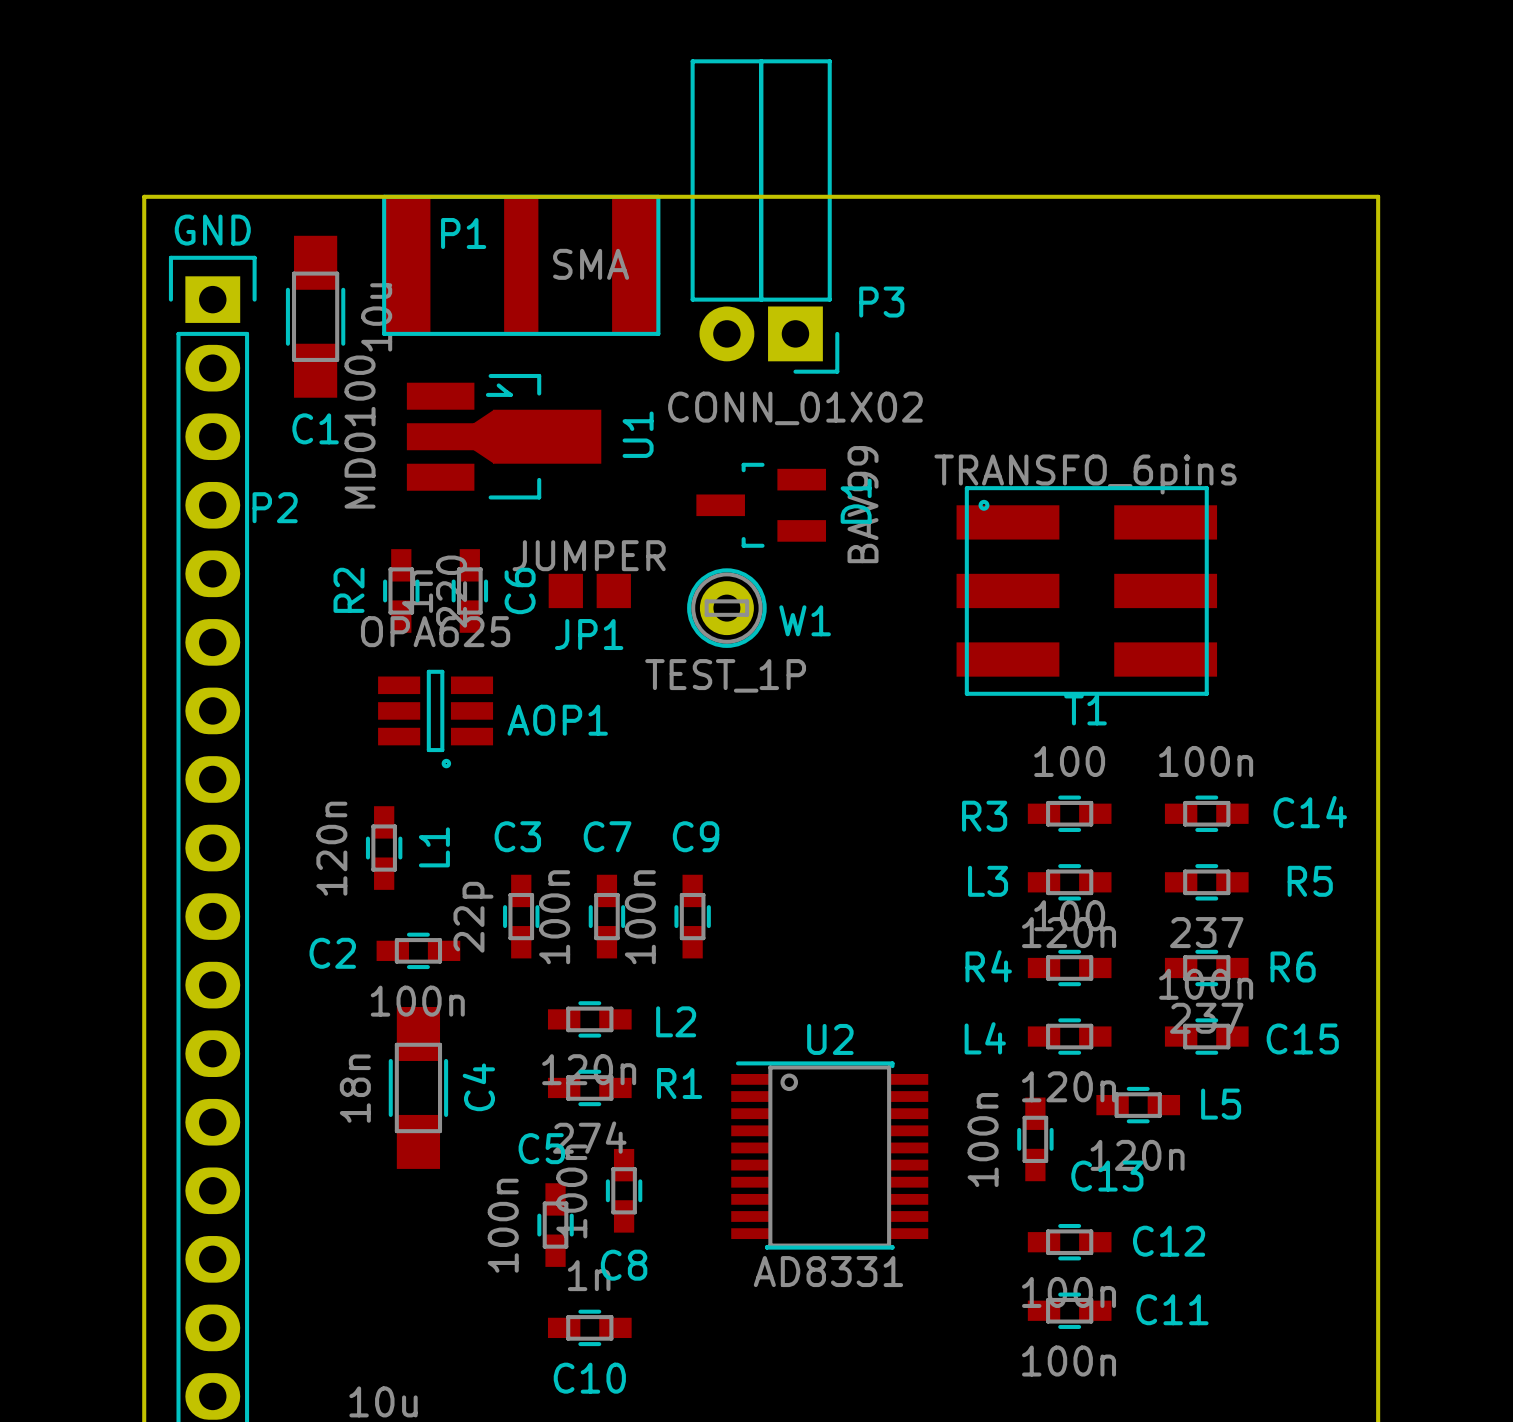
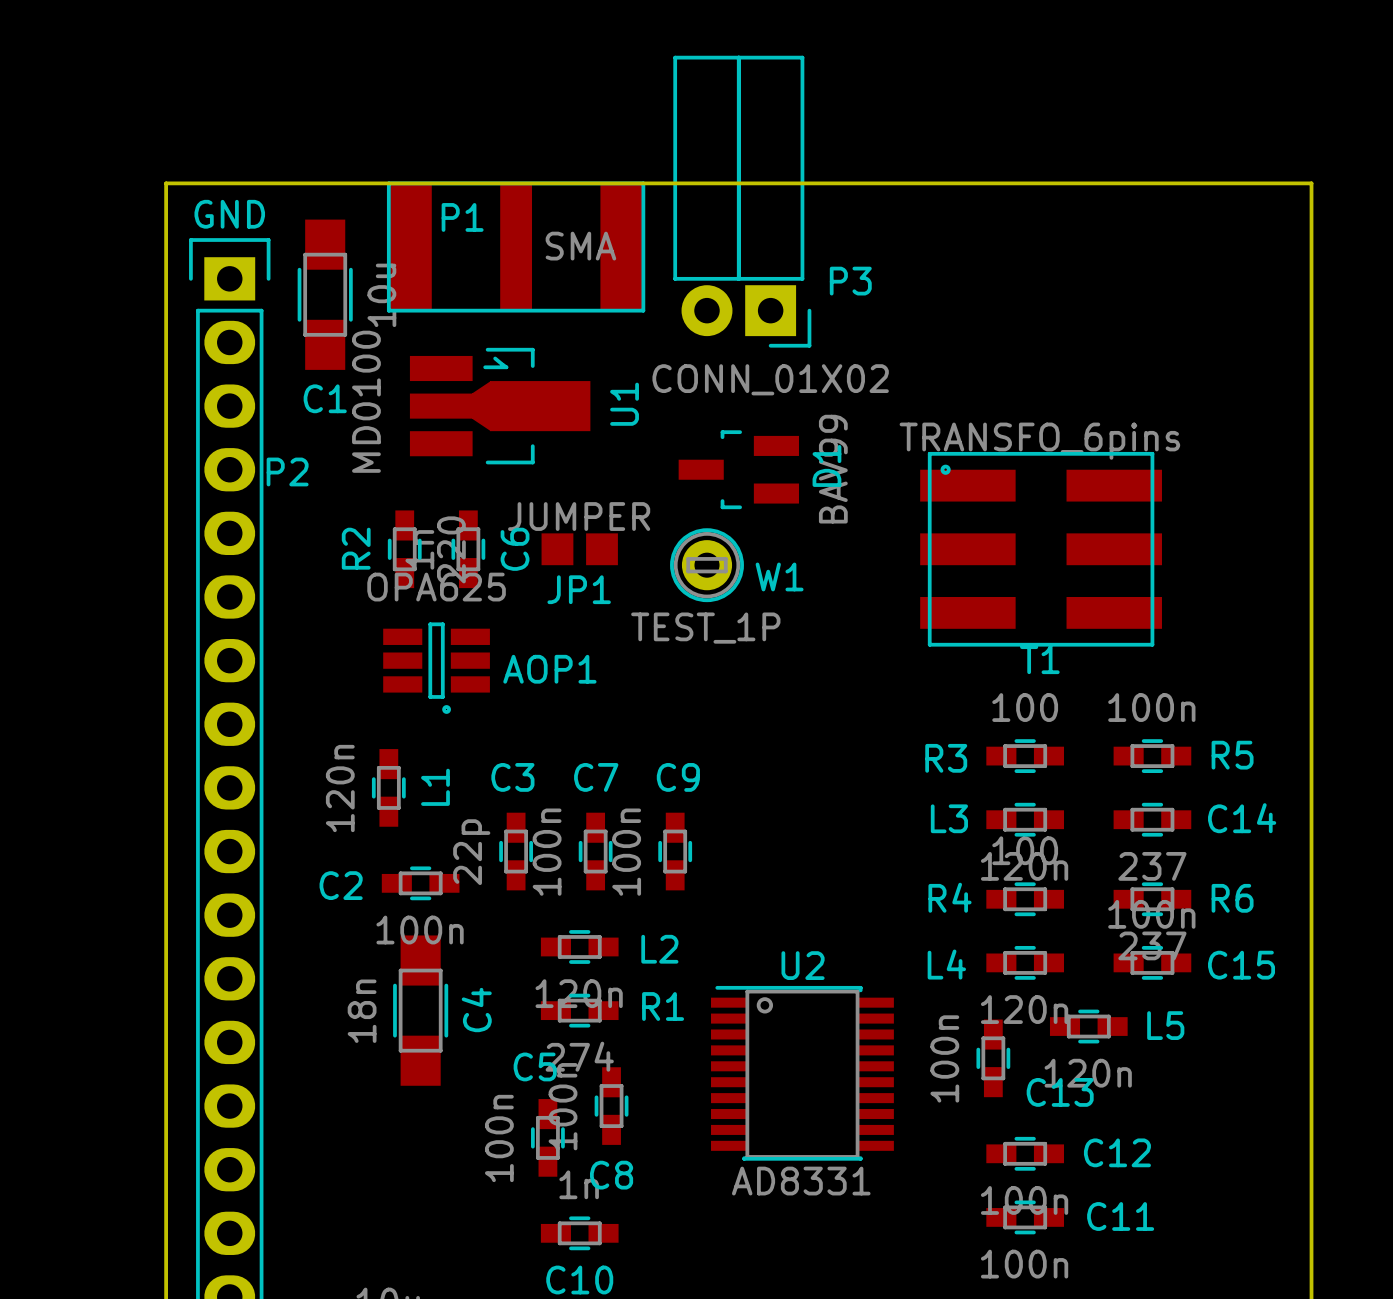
C14 name position: C14 (1310, 812) -> C14 (1242, 818)
R5 name position: R5 (1310, 881) -> R5 (1232, 755)

